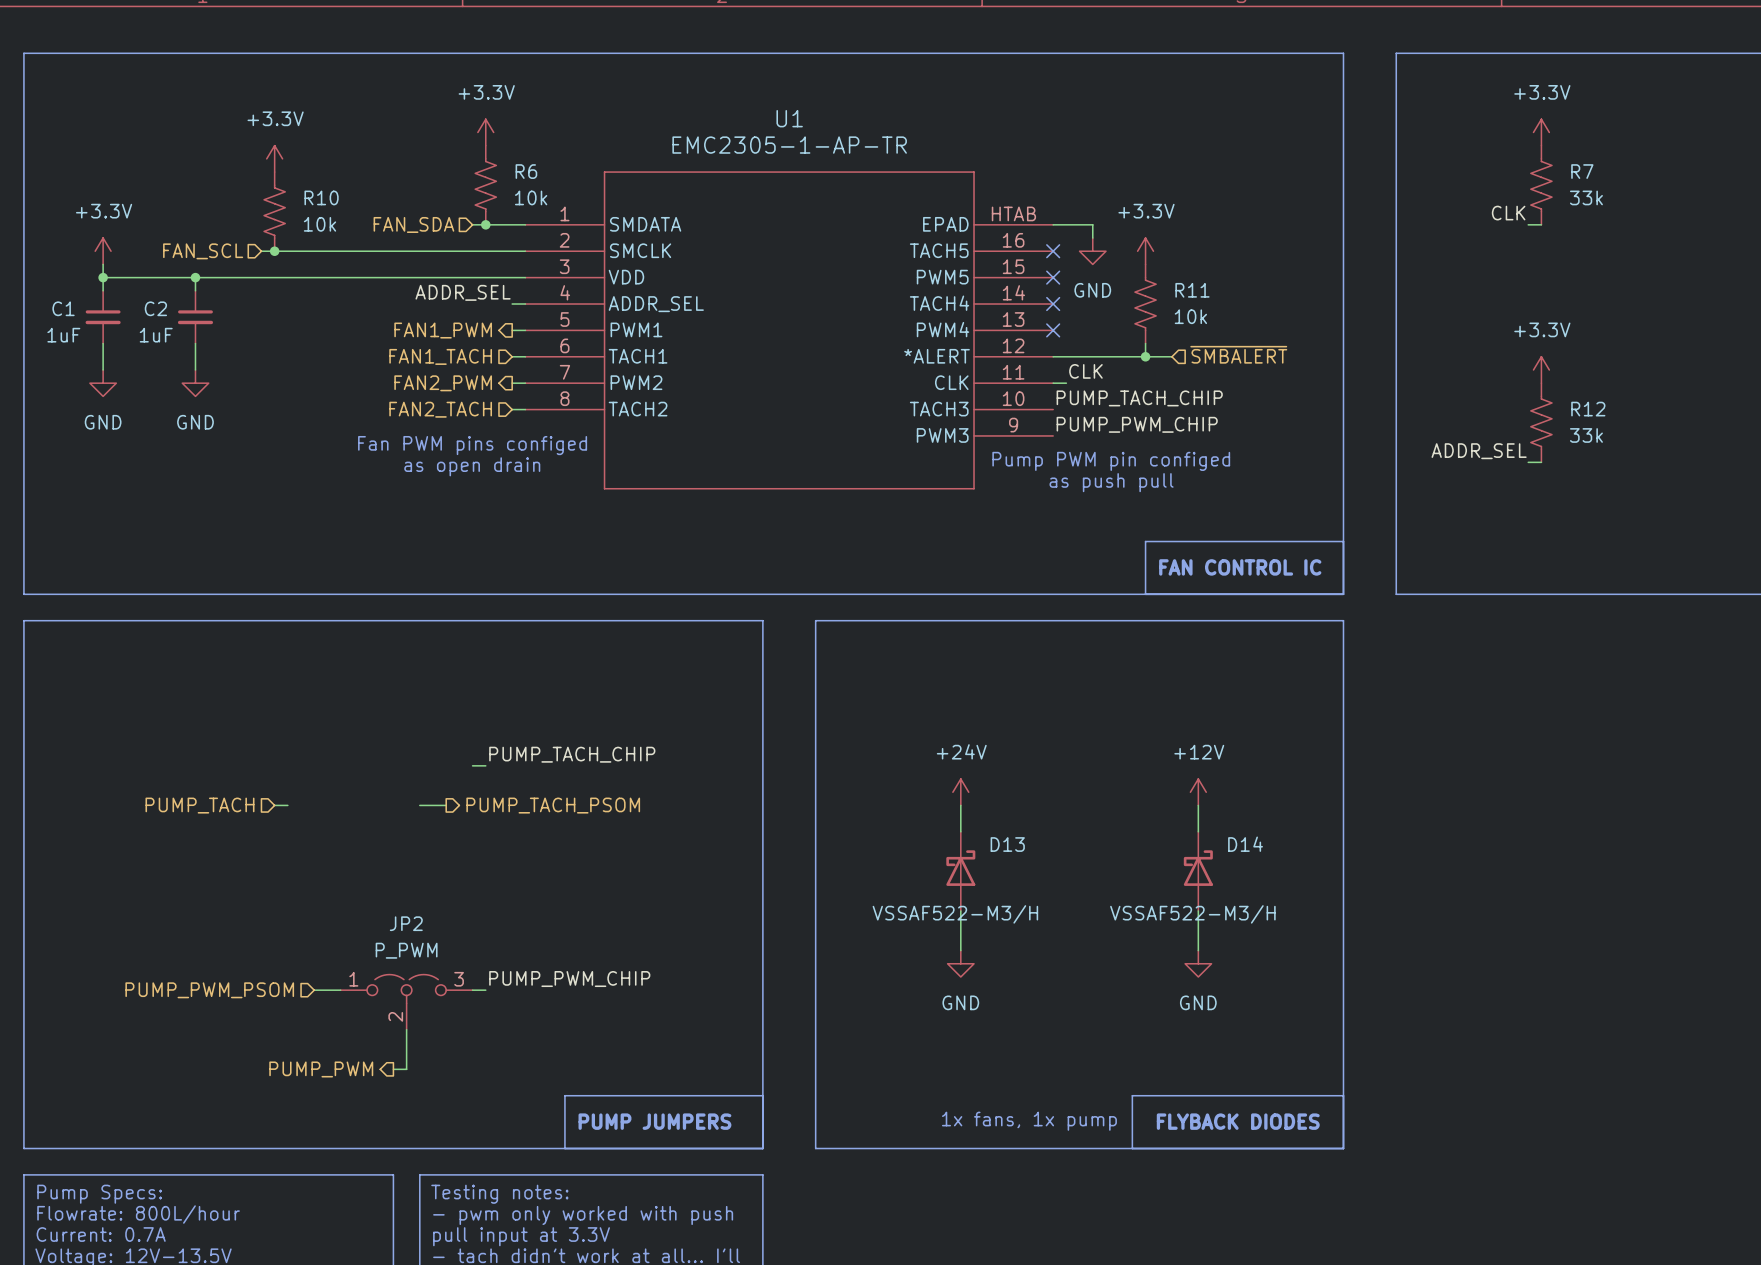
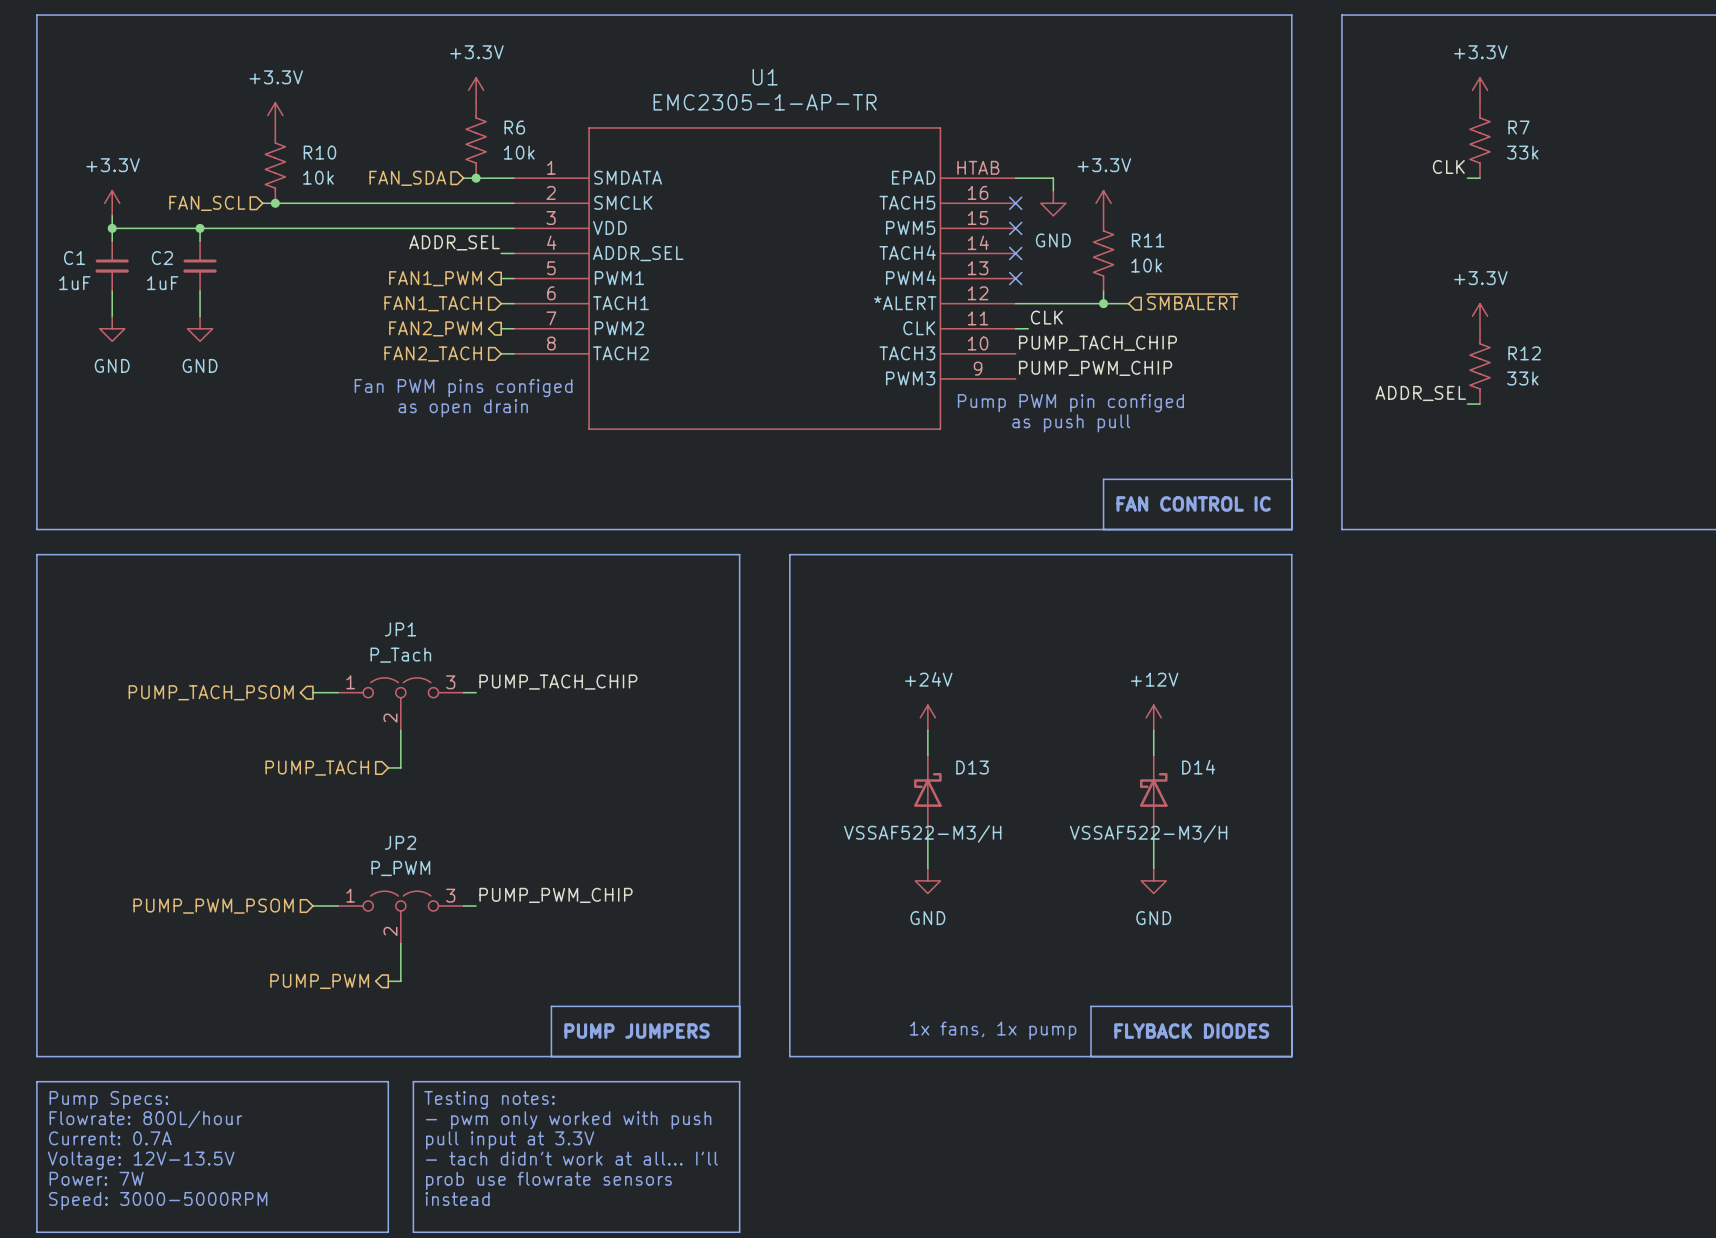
JP1: none -> P_Tach (400, 704)
hierarchical label position: PUMP_TACH (199, 805) -> PUMP_TACH (317, 768)
wire: (274, 805) (287, 805) -> none
wire: none -> (400, 730) (400, 767) (388, 767)
wire: (419, 805) (446, 805) -> (312, 692) (338, 692)
hierarchical label rotation: 0° (553, 805) -> 180° (211, 692)
hierarchical label position: PUMP_TACH_PSOM (553, 805) -> PUMP_TACH_PSOM (211, 692)

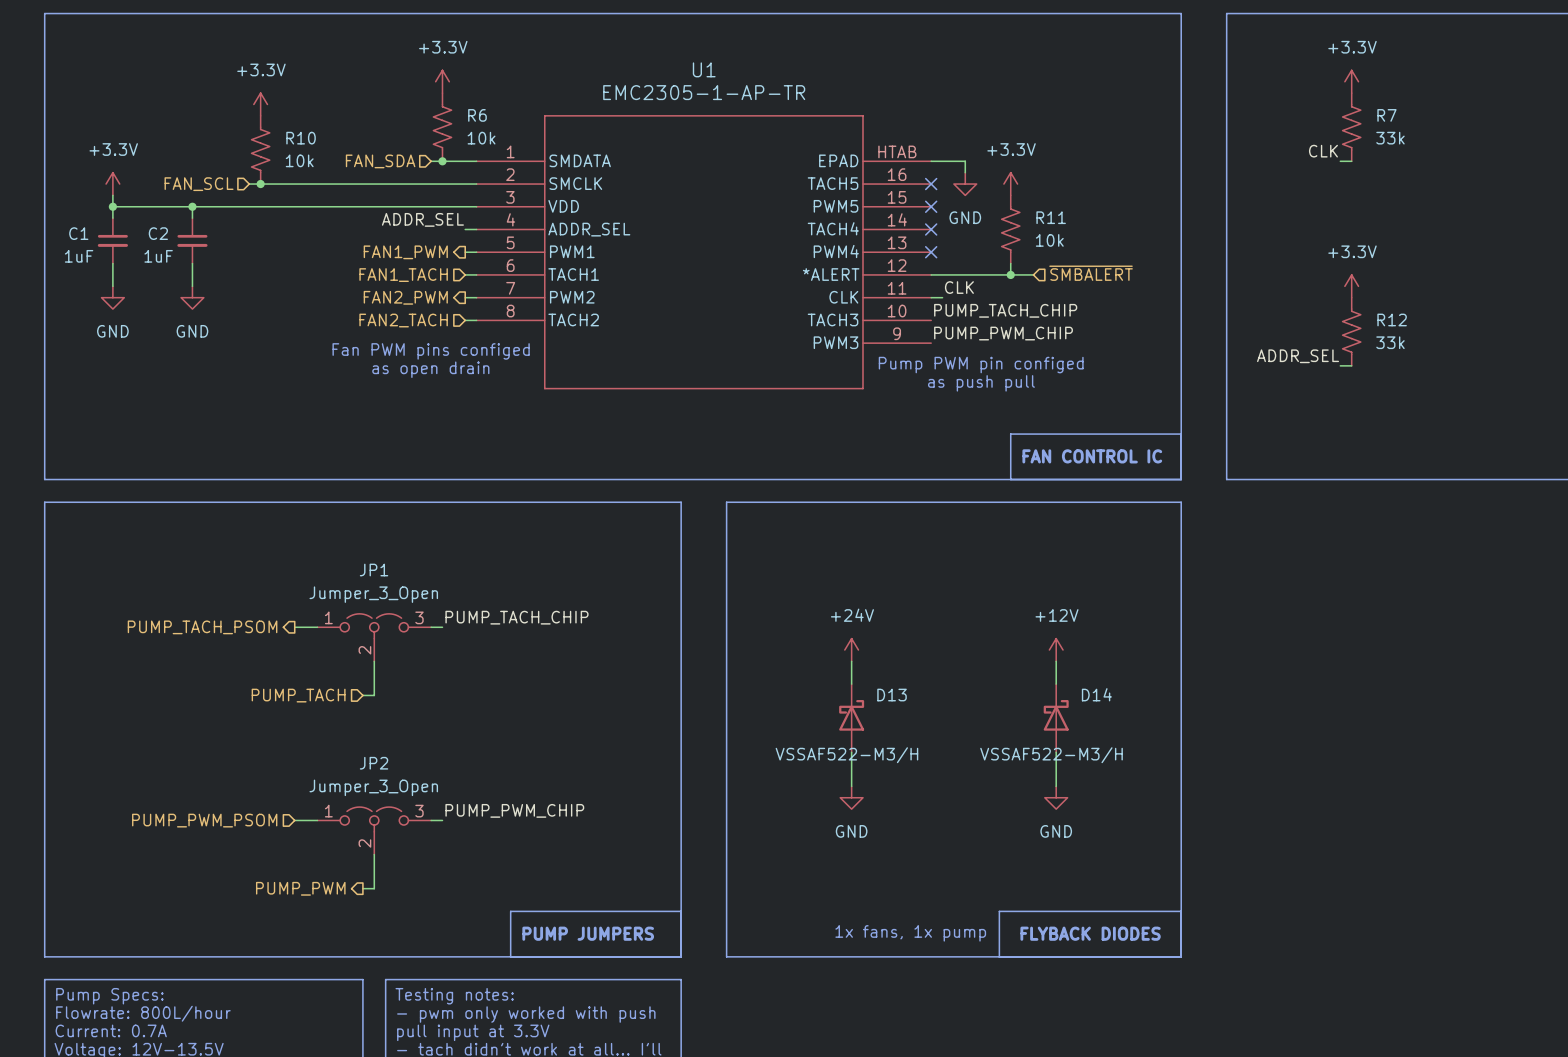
JP1 value: P_Tach (400, 655) -> Jumper_3_Open (373, 594)
JP2 value: P_PWM (400, 868) -> Jumper_3_Open (373, 787)

